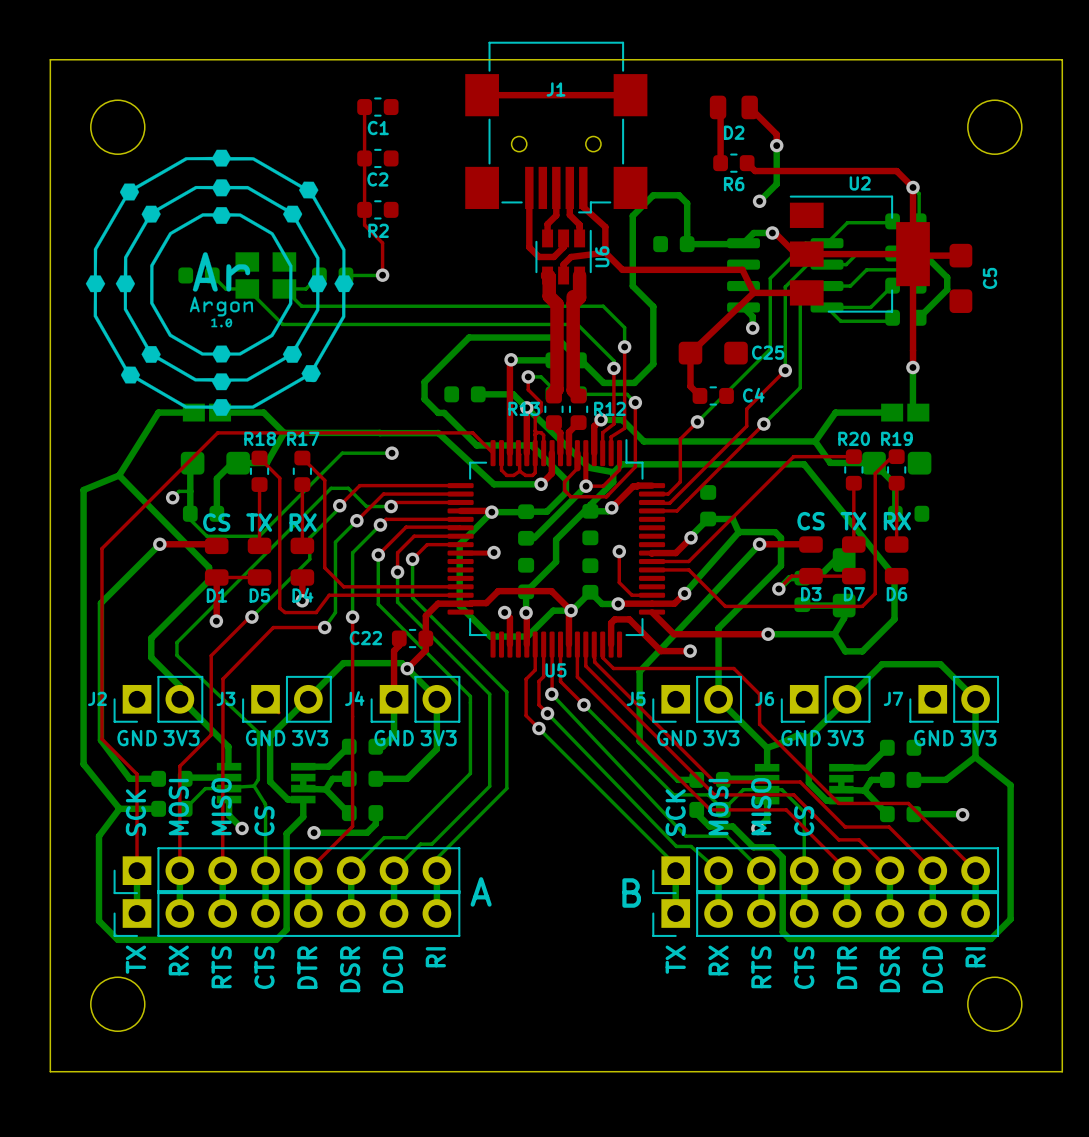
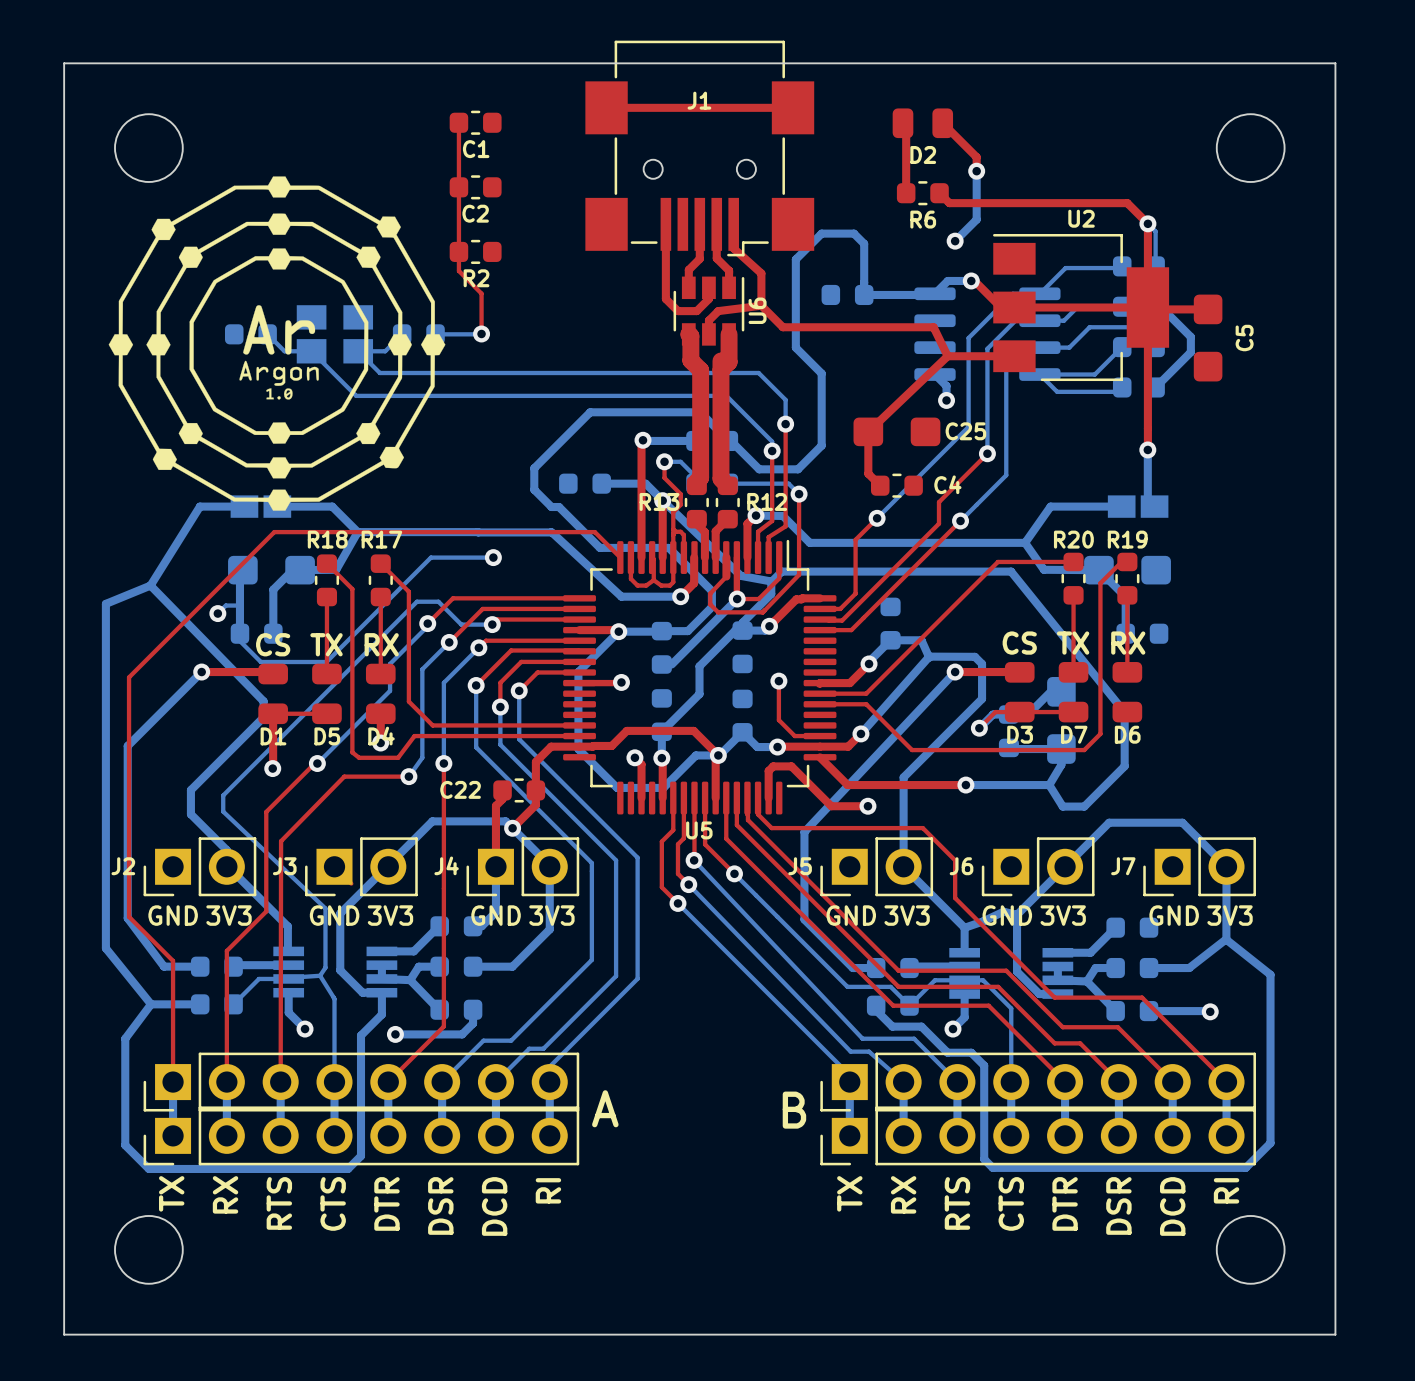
text: MISO (221, 806) -> none
text: MISO (761, 806) -> none
text: MOSI (178, 807) -> none
text: MOSI (718, 807) -> none
text: SCK (135, 812) -> none
text: SCK (675, 812) -> none
text: CS (264, 821) -> none
text: CS (804, 821) -> none

